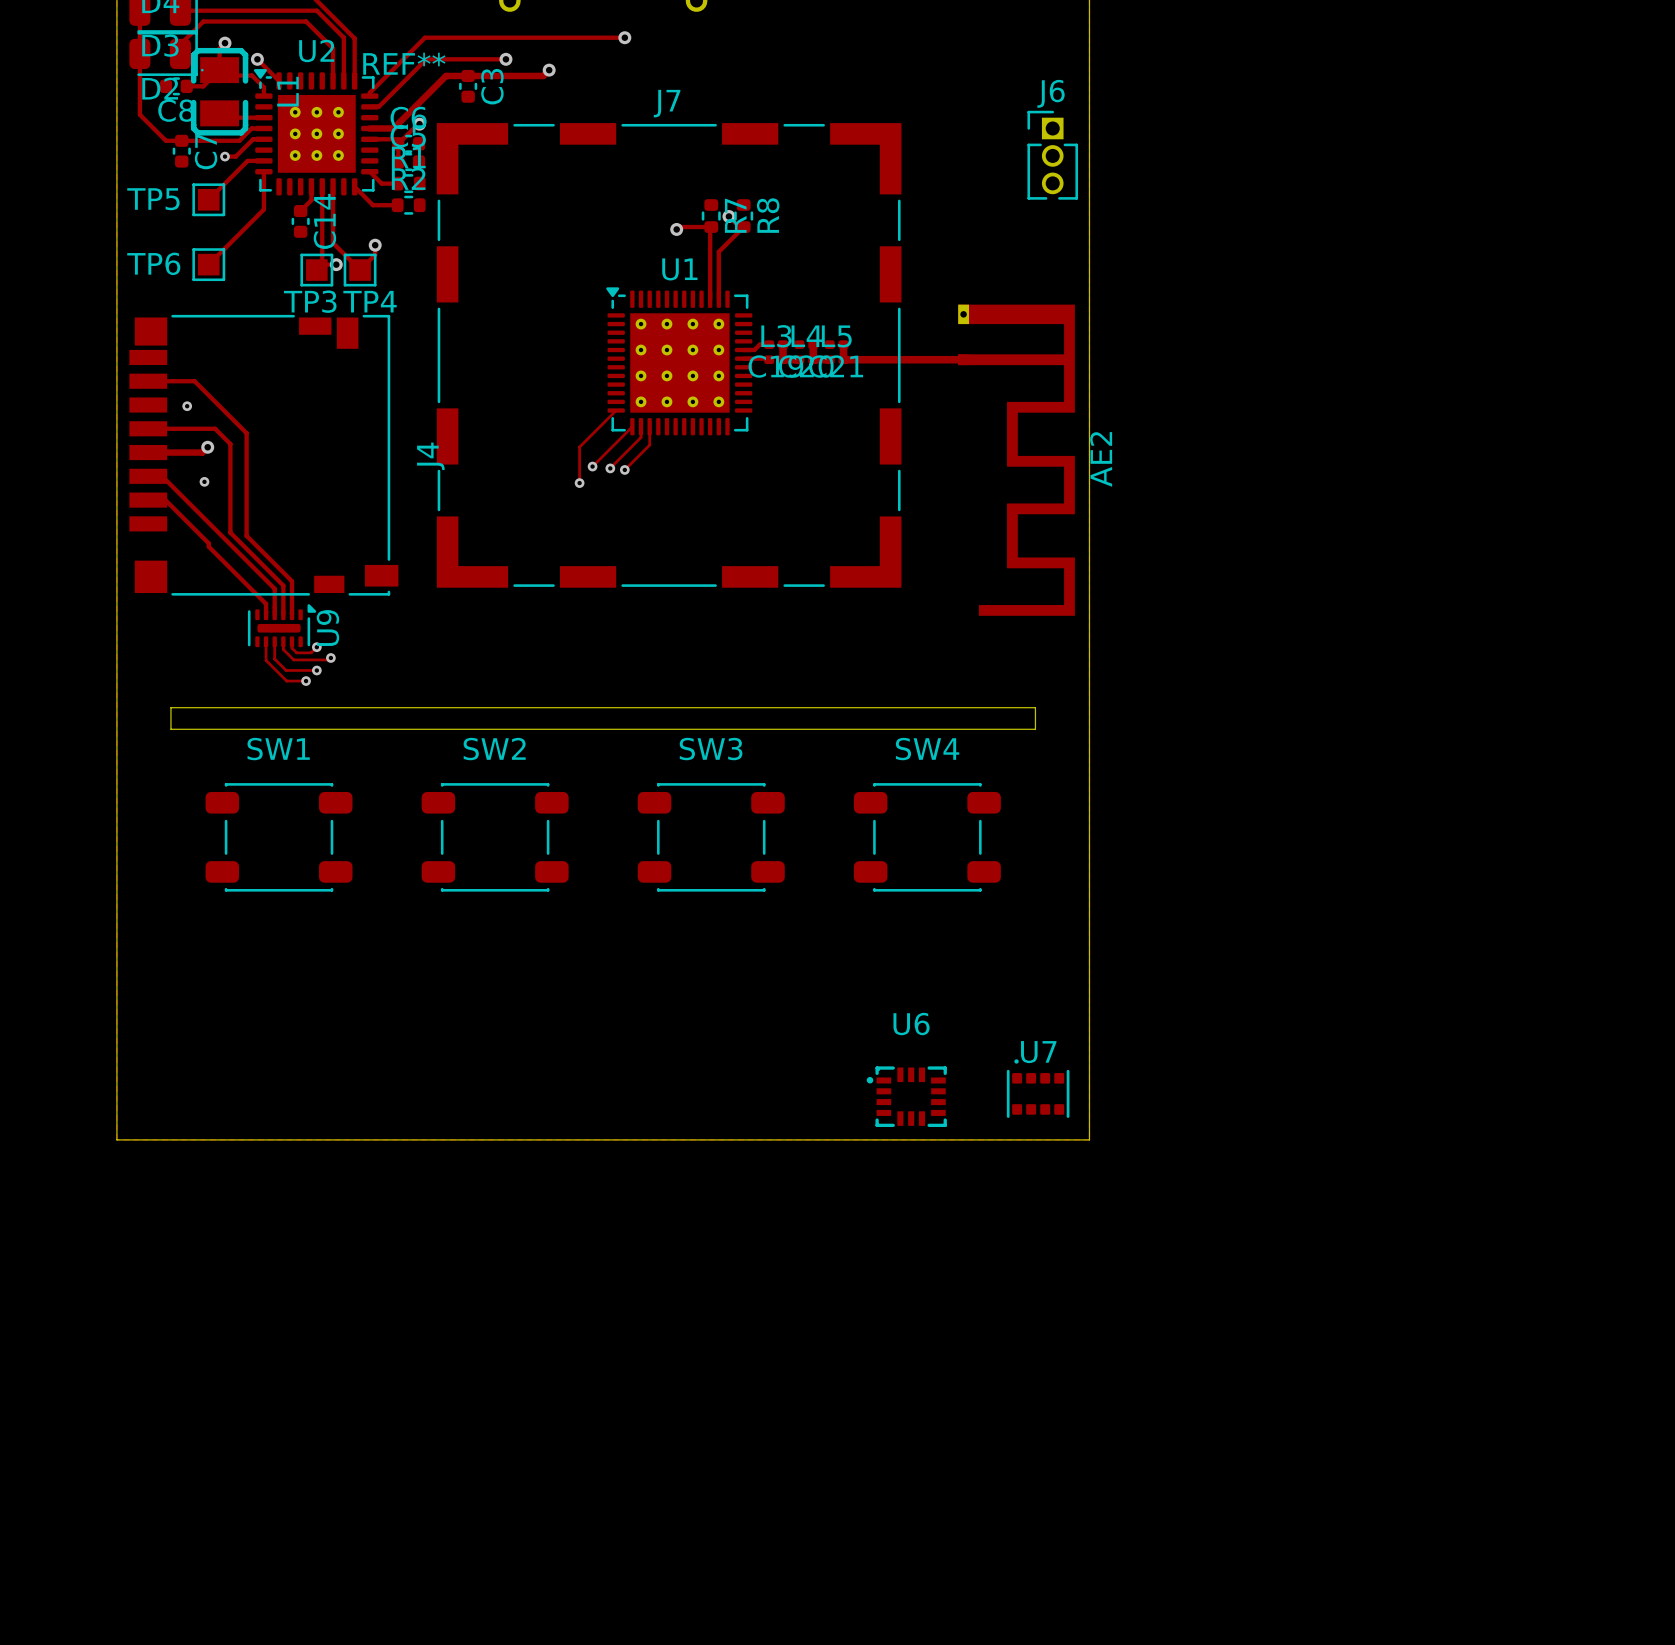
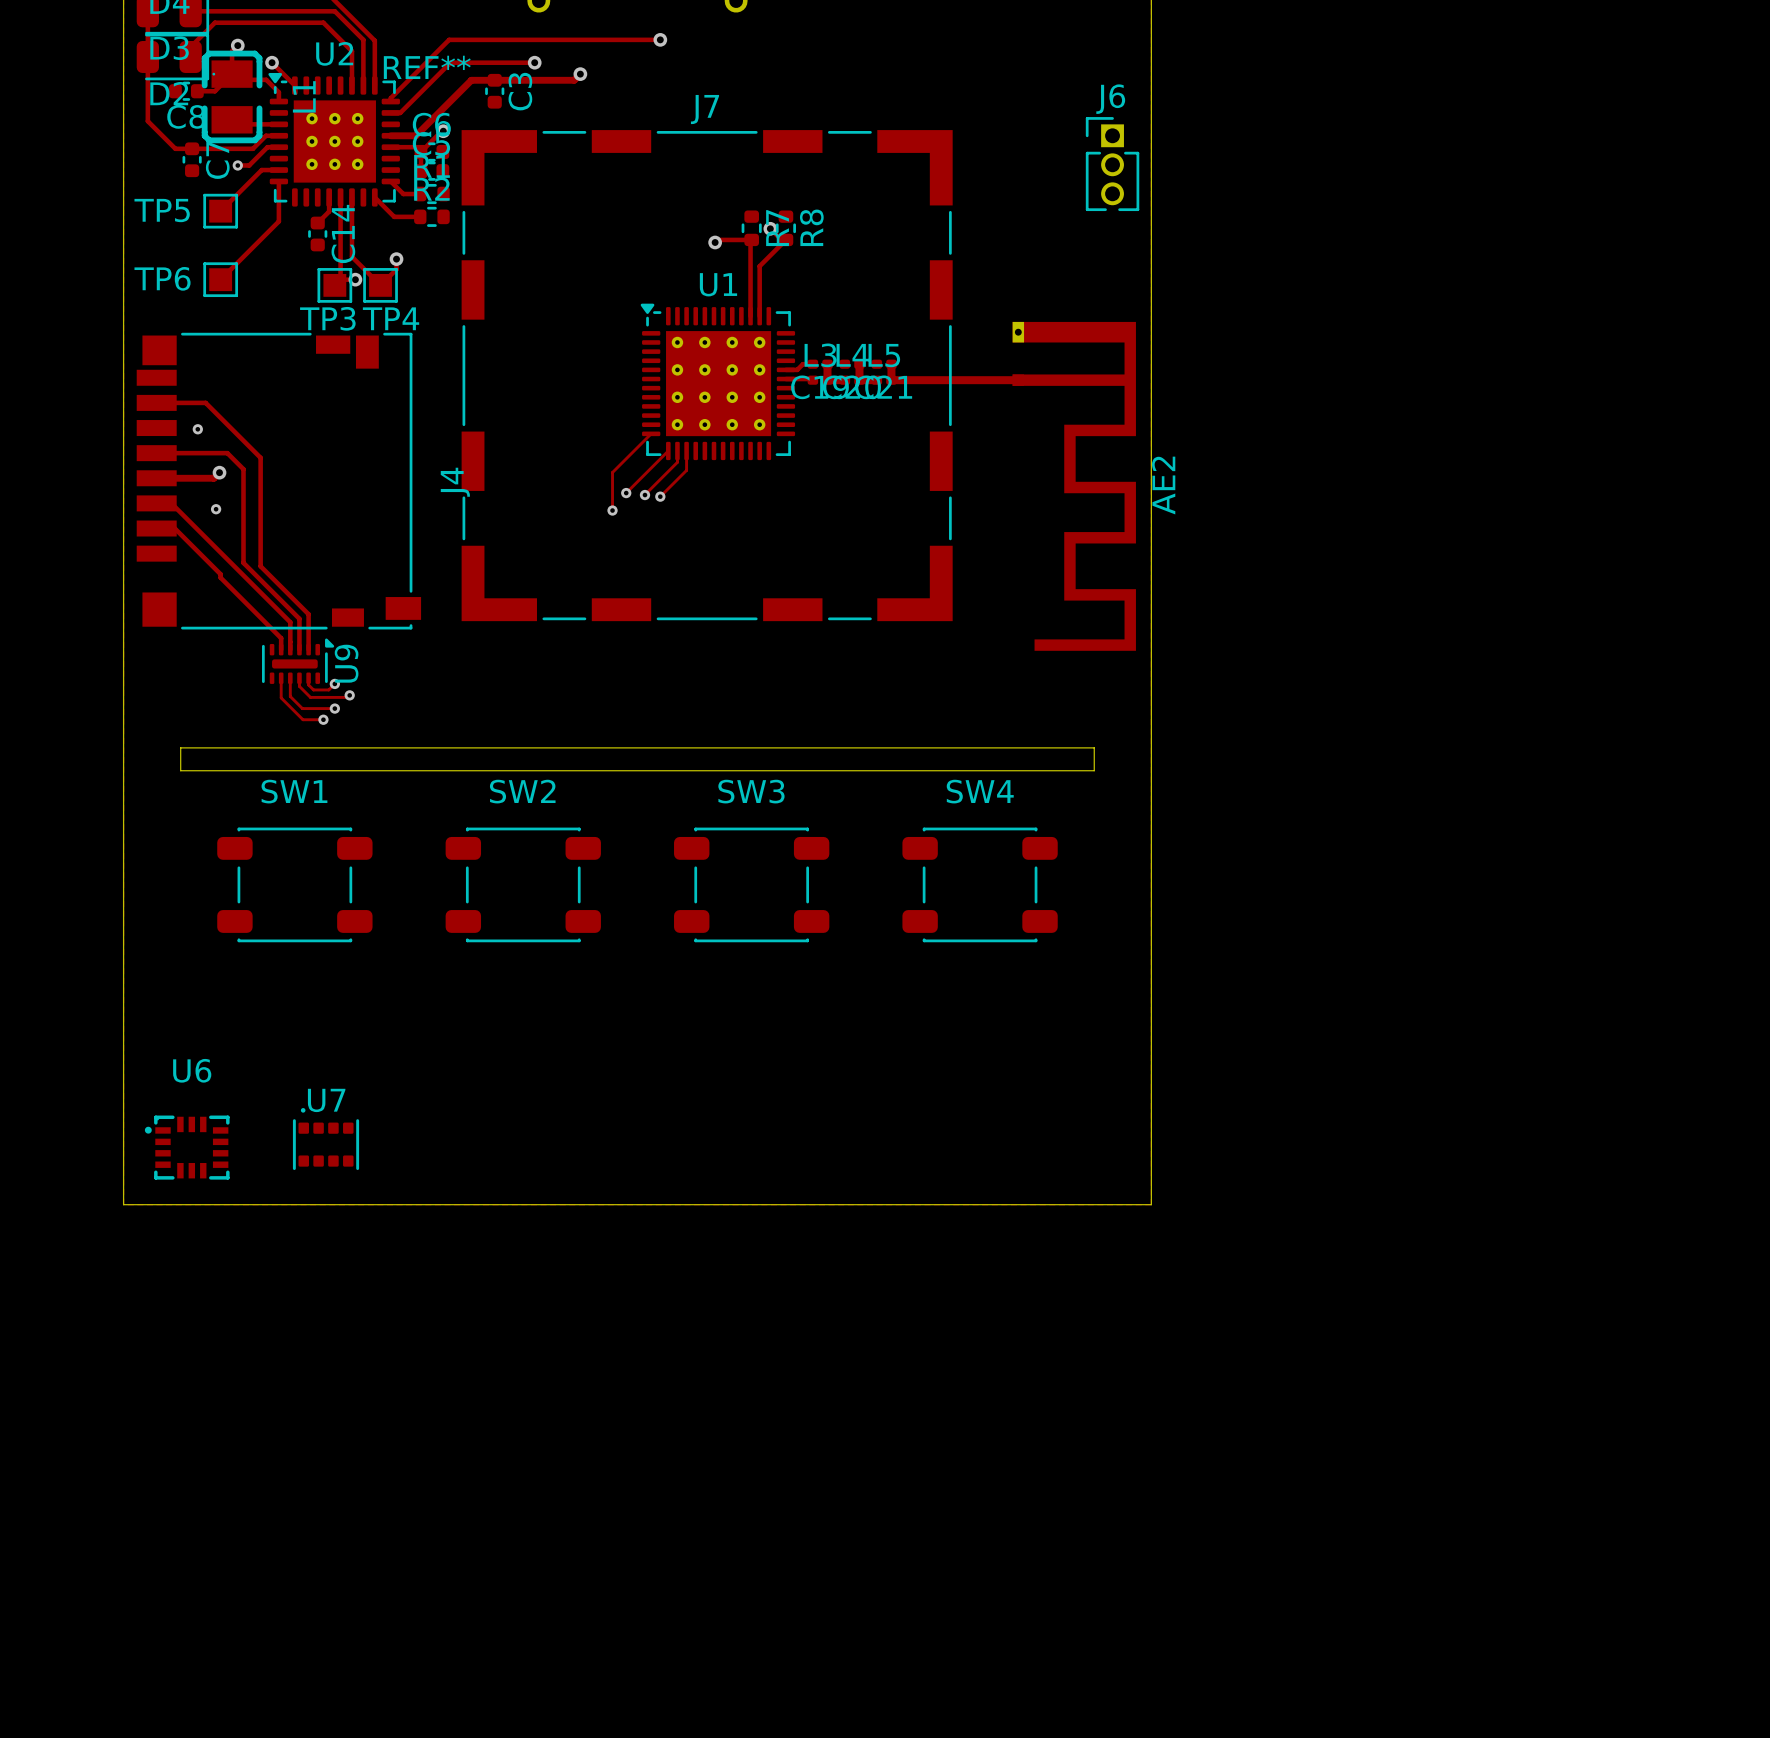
U7 position: (1038, 1088) -> (326, 1139)
U6 position: (906, 1096) -> (187, 1147)

